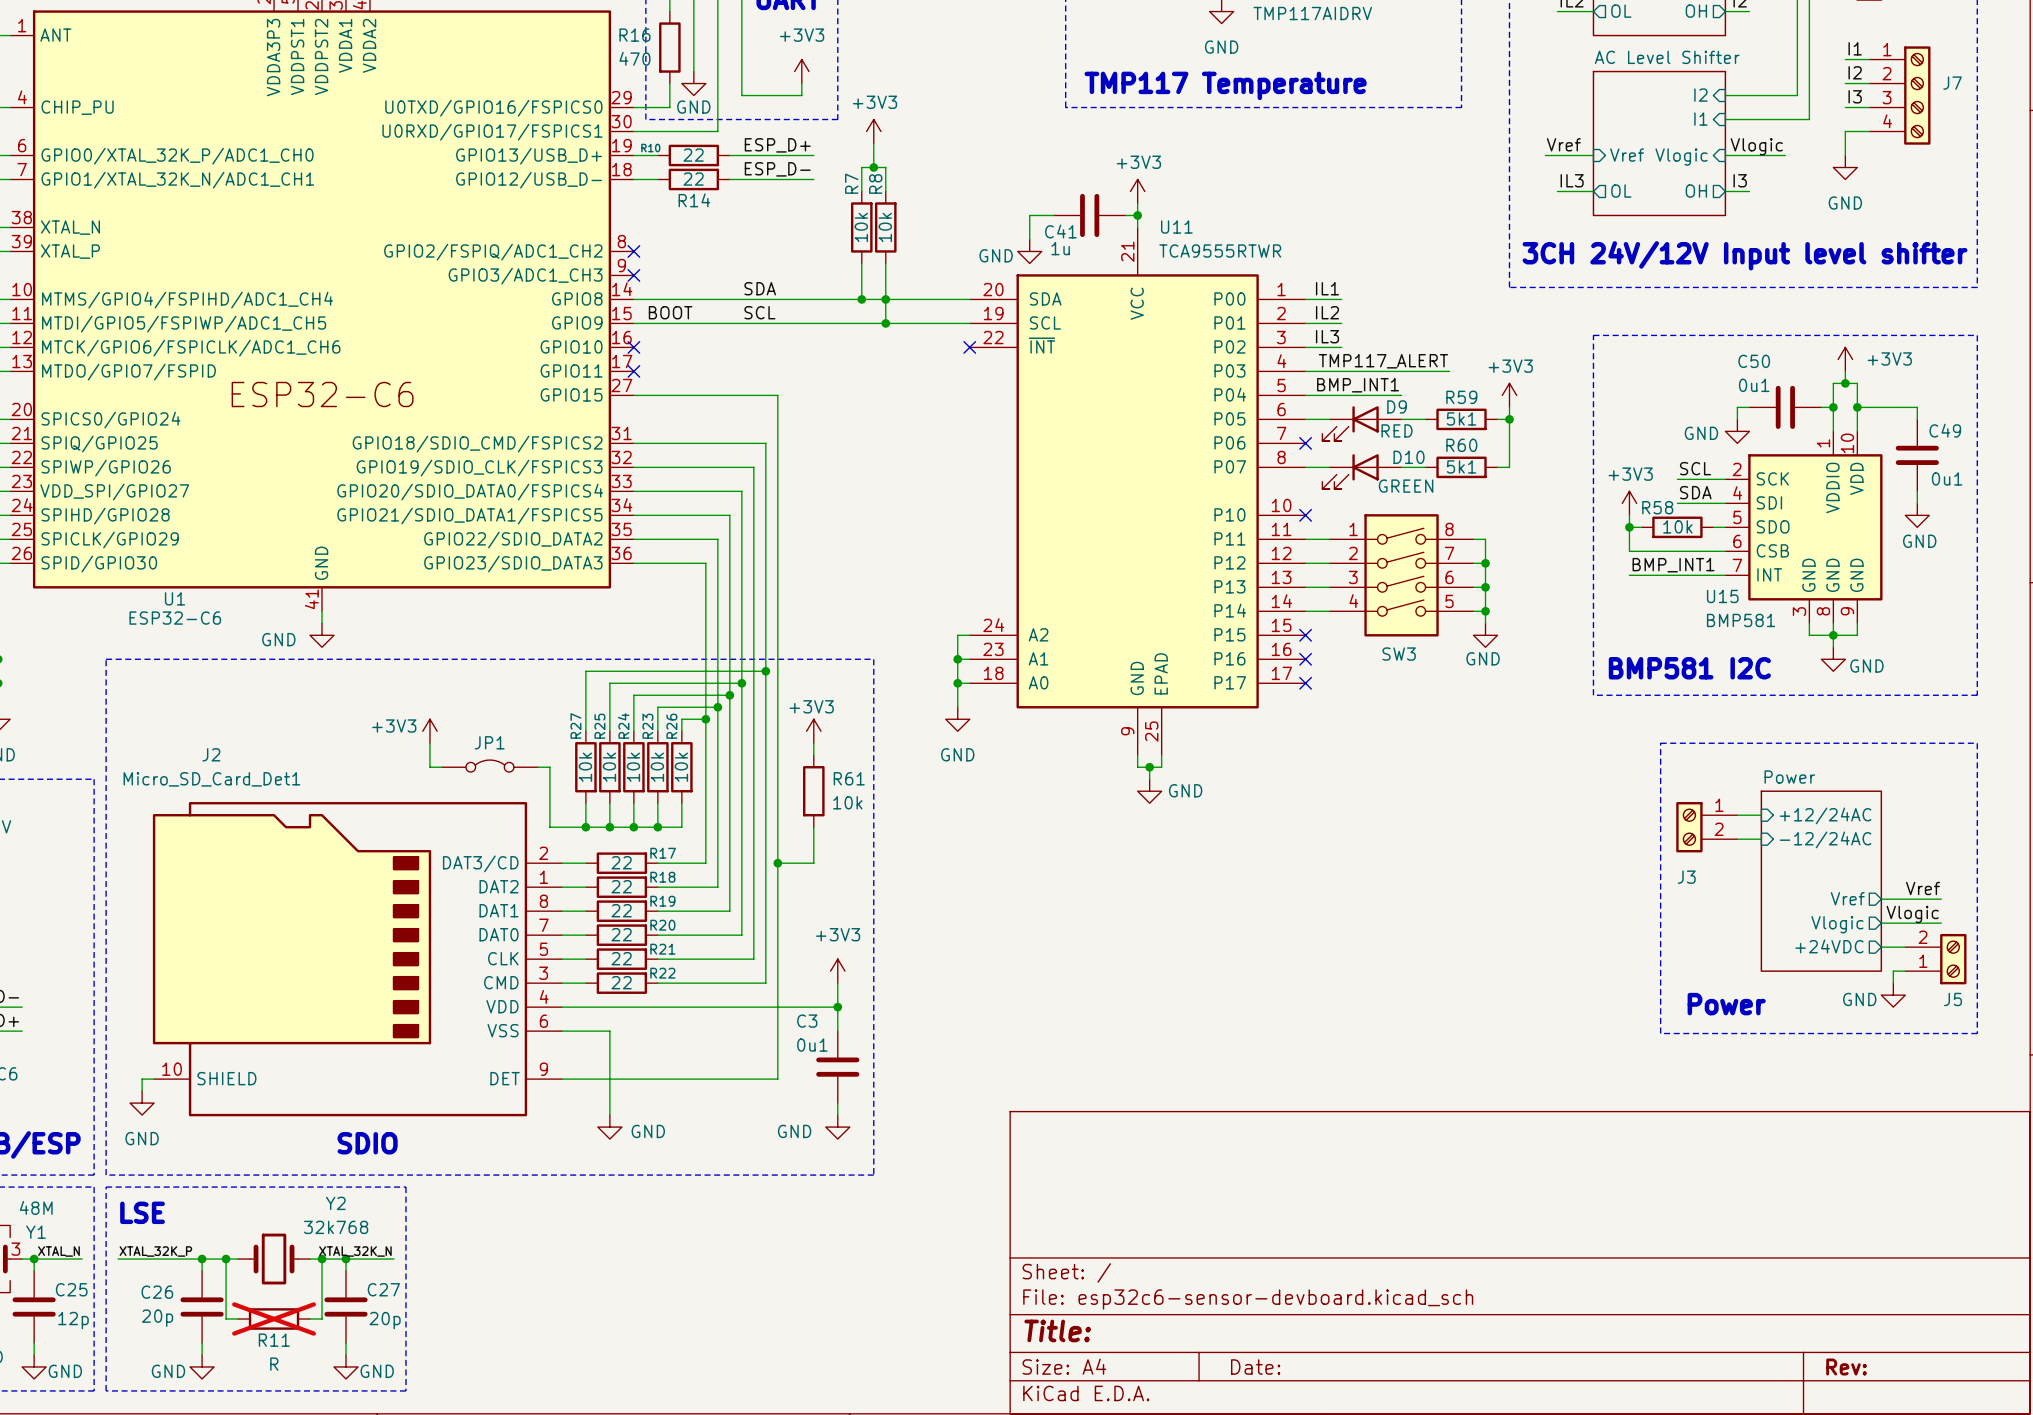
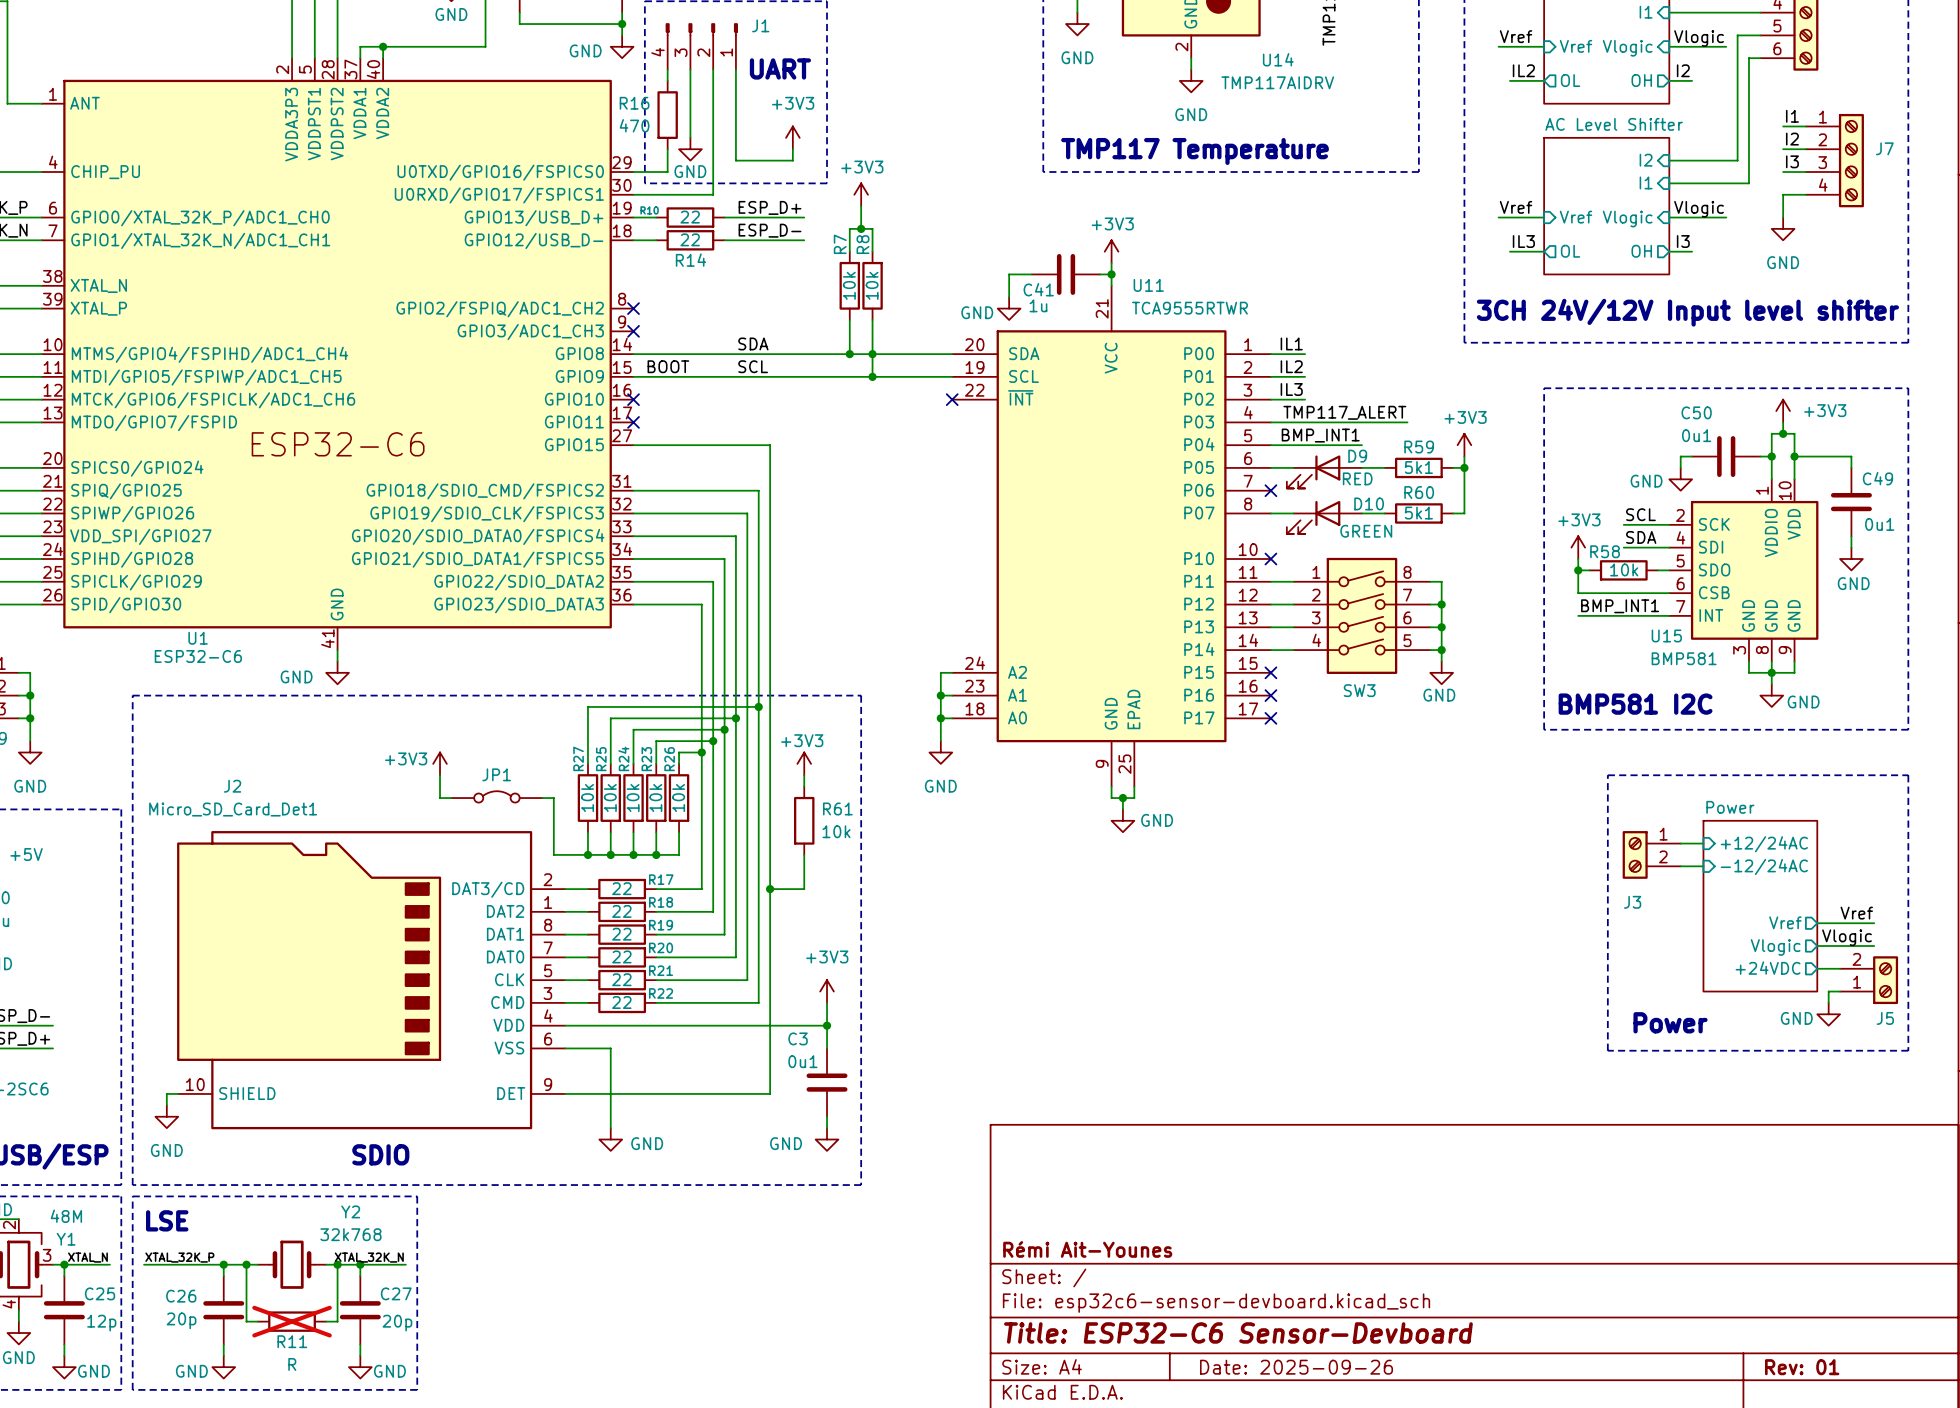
title block: none -> Rémi Ait-Younes (1087, 1249)
title block: Title: (1057, 1330) -> Title: ESP32-C6 Sensor-Devboard (1238, 1332)
title block: Date: (1255, 1367) -> Date: 2025-09-26 (1296, 1367)
title block: Rev: (1846, 1367) -> Rev: 01 (1802, 1367)

